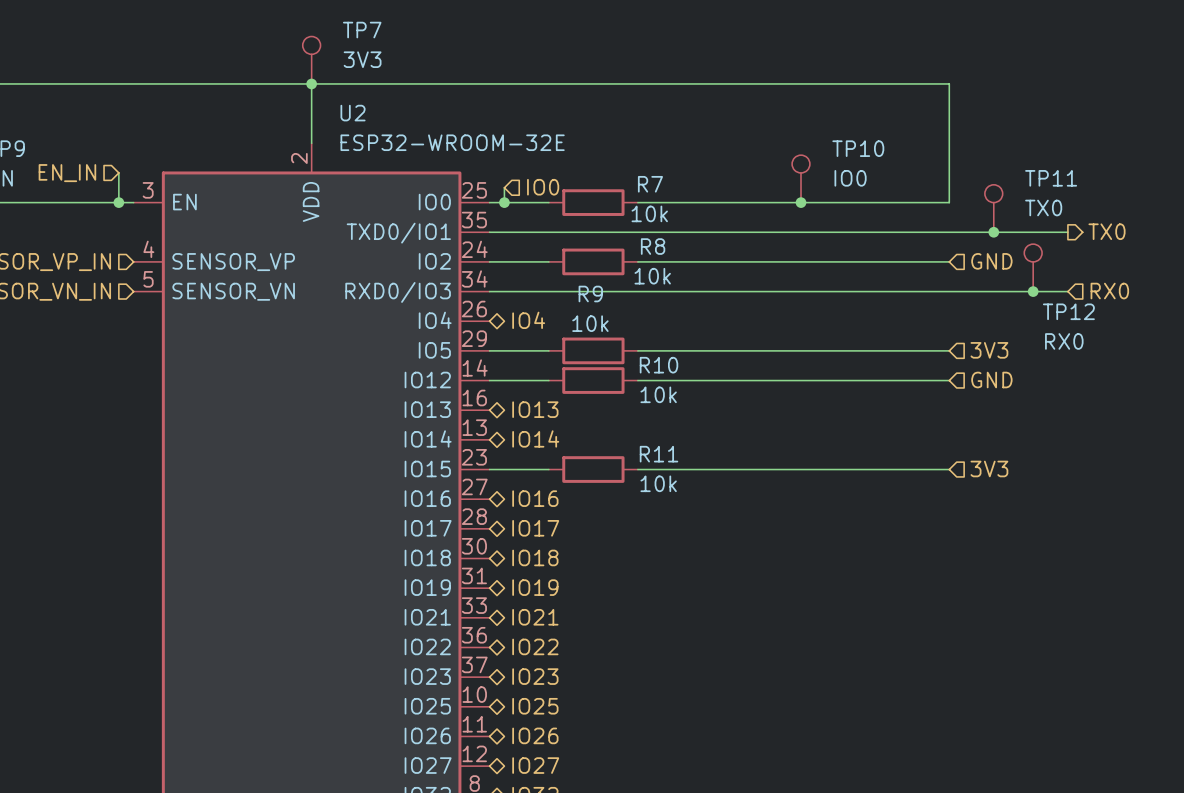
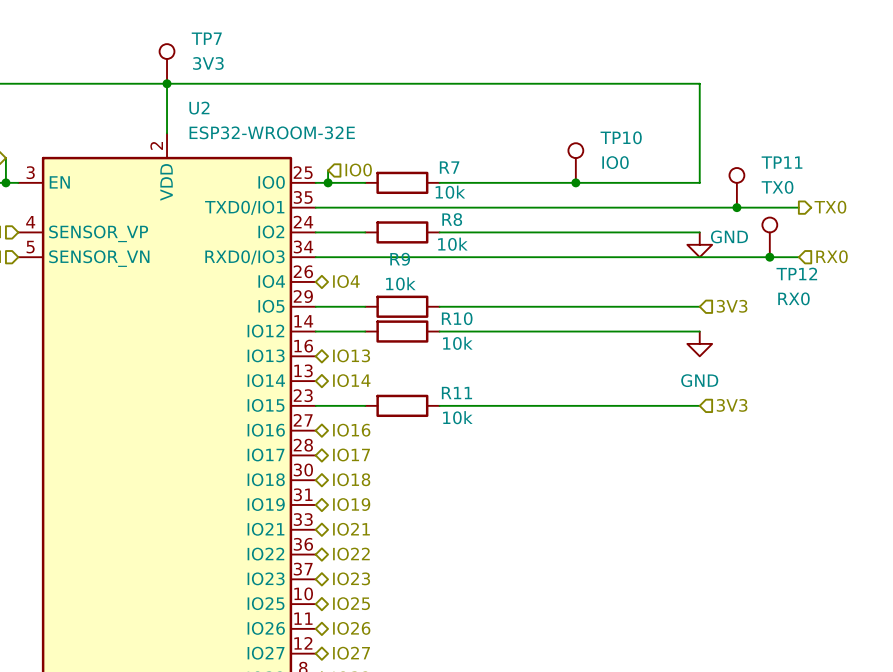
hierarchical label: GND (991, 261) -> none
power symbol: none -> GND (699, 244)
hierarchical label: GND (991, 380) -> none
power symbol: none -> GND (699, 343)

